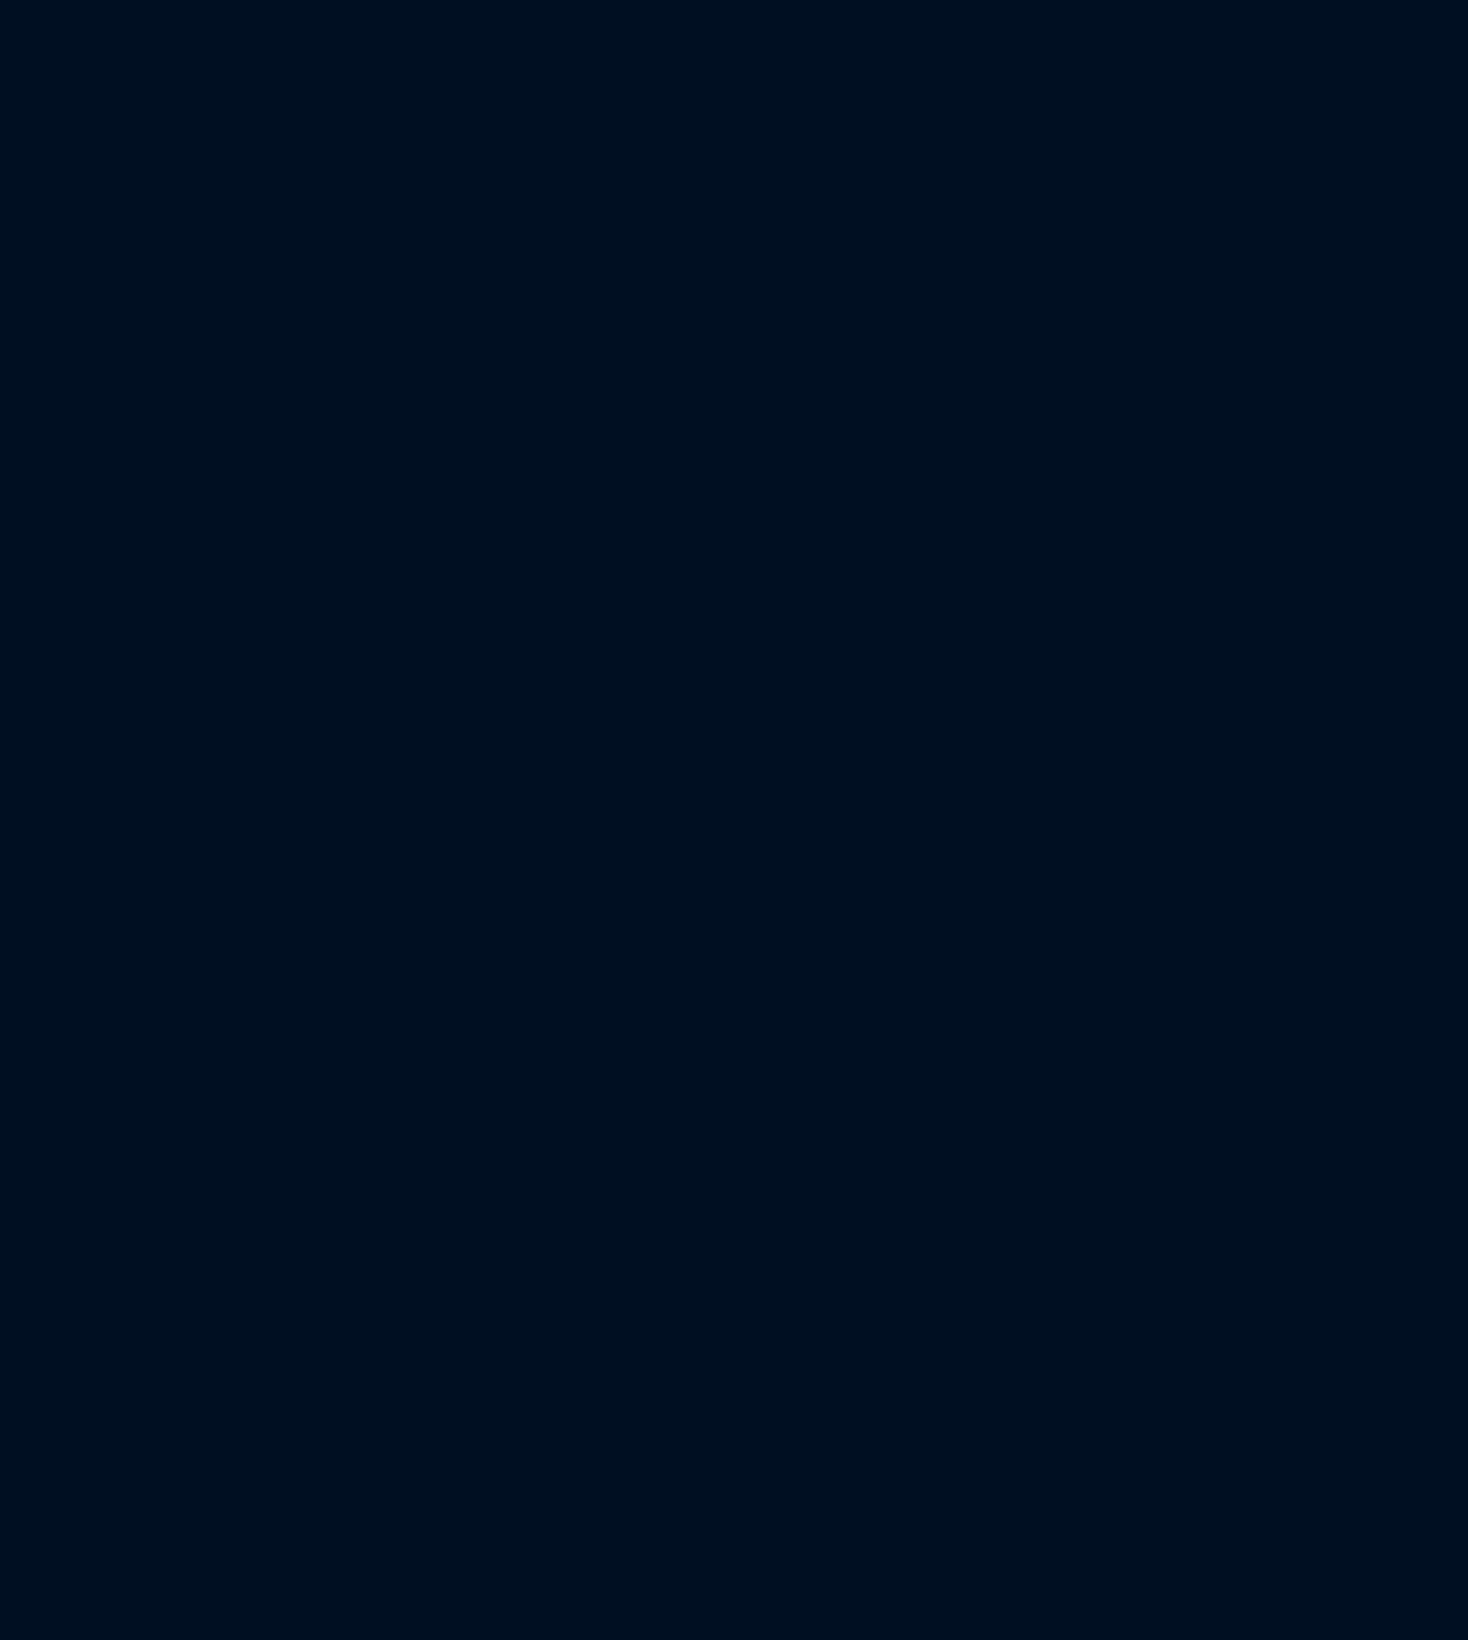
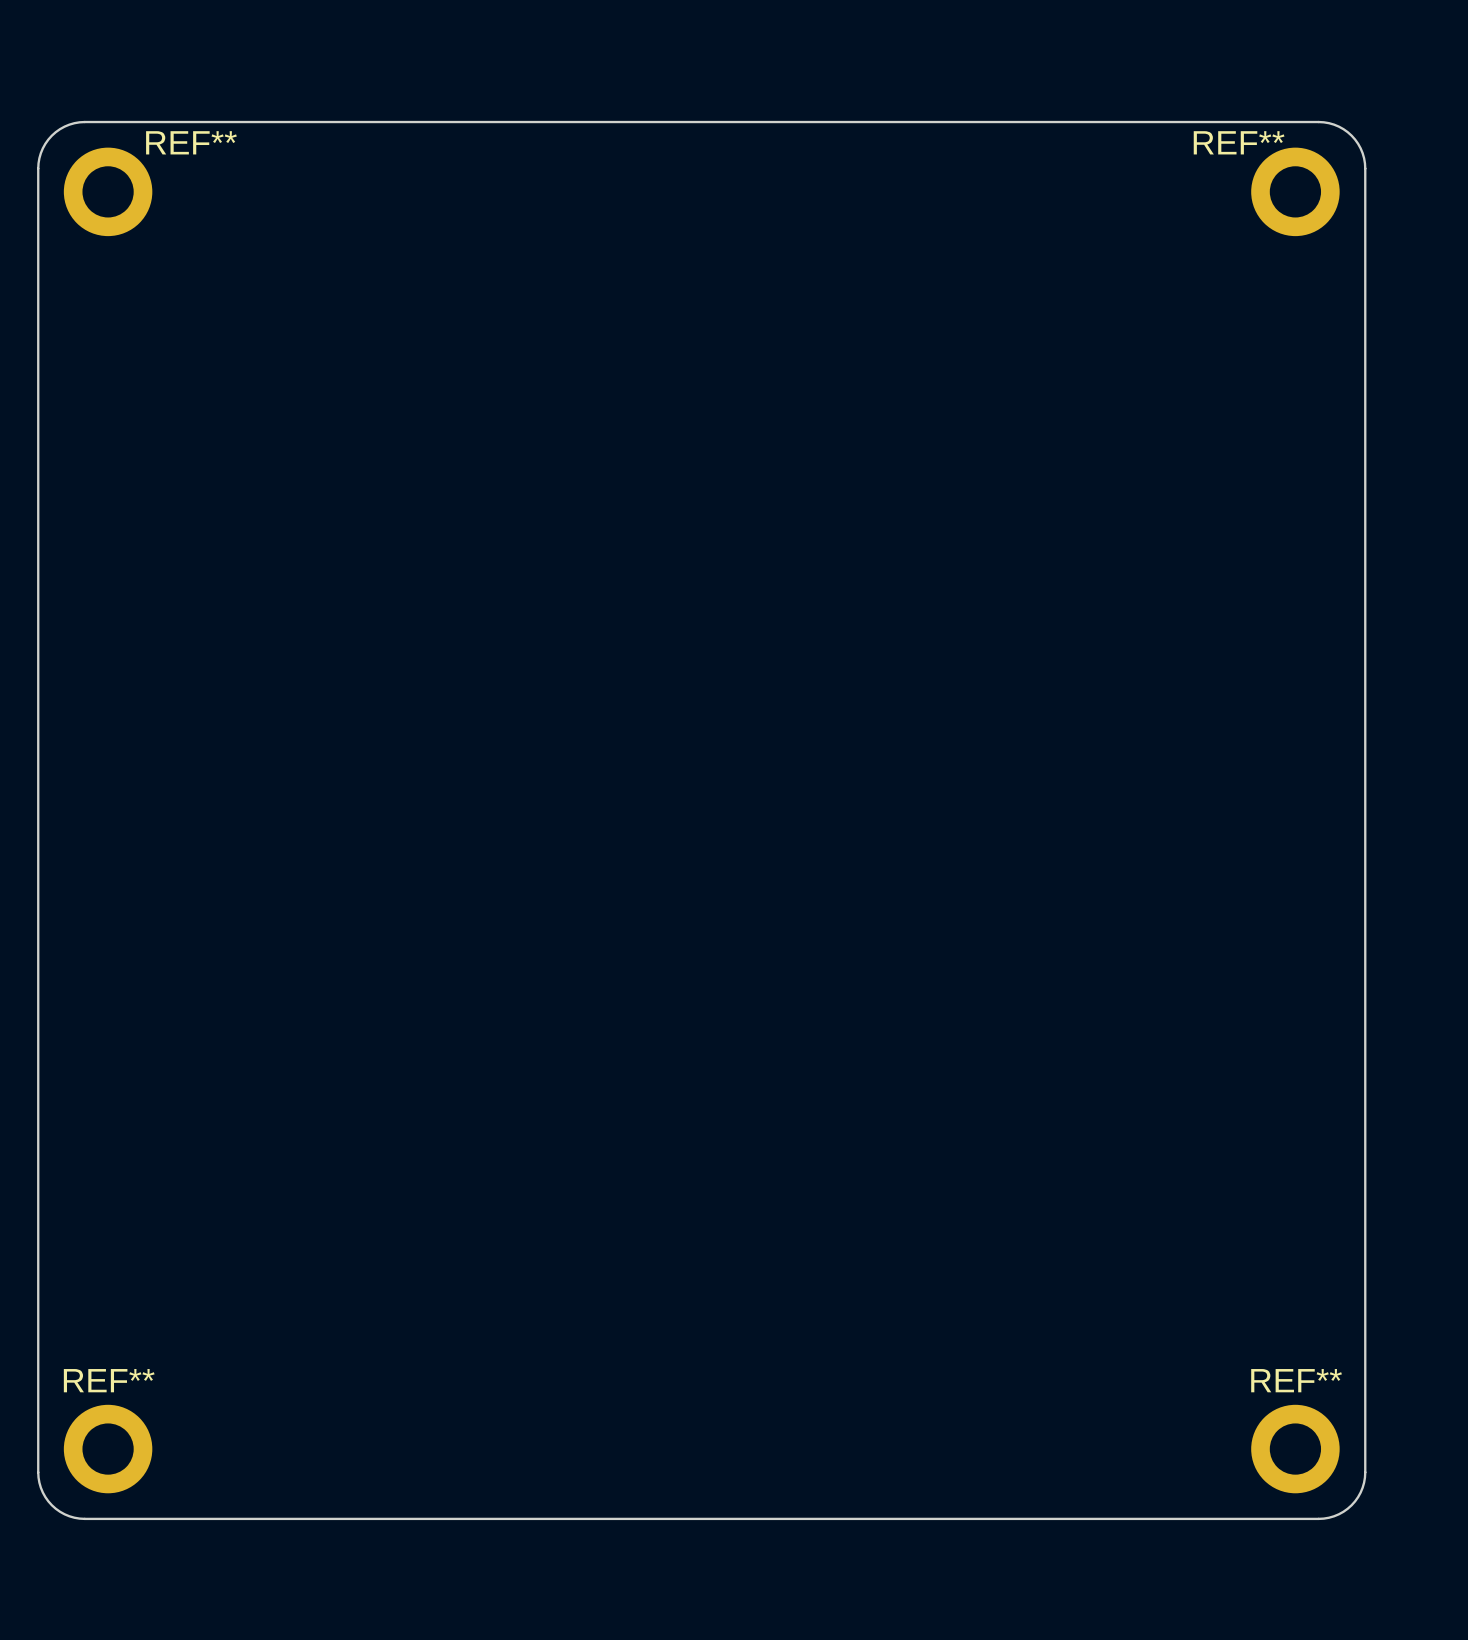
board edge: none -> (84, 122) (1318, 122) (1338, 126) (1351, 135) (1360, 148) (1365, 168) (1365, 1472) (1360, 1492) (1351, 1505) (1334, 1516) (1318, 1518) (84, 1518) (64, 1514) (51, 1505) (42, 1492) (38, 1472) (38, 168) (40, 153) (51, 135) (69, 124) (84, 122)
REF**: none -> (108, 191)
REF**: none -> (1295, 191)
REF**: none -> (108, 1449)
REF**: none -> (1295, 1449)

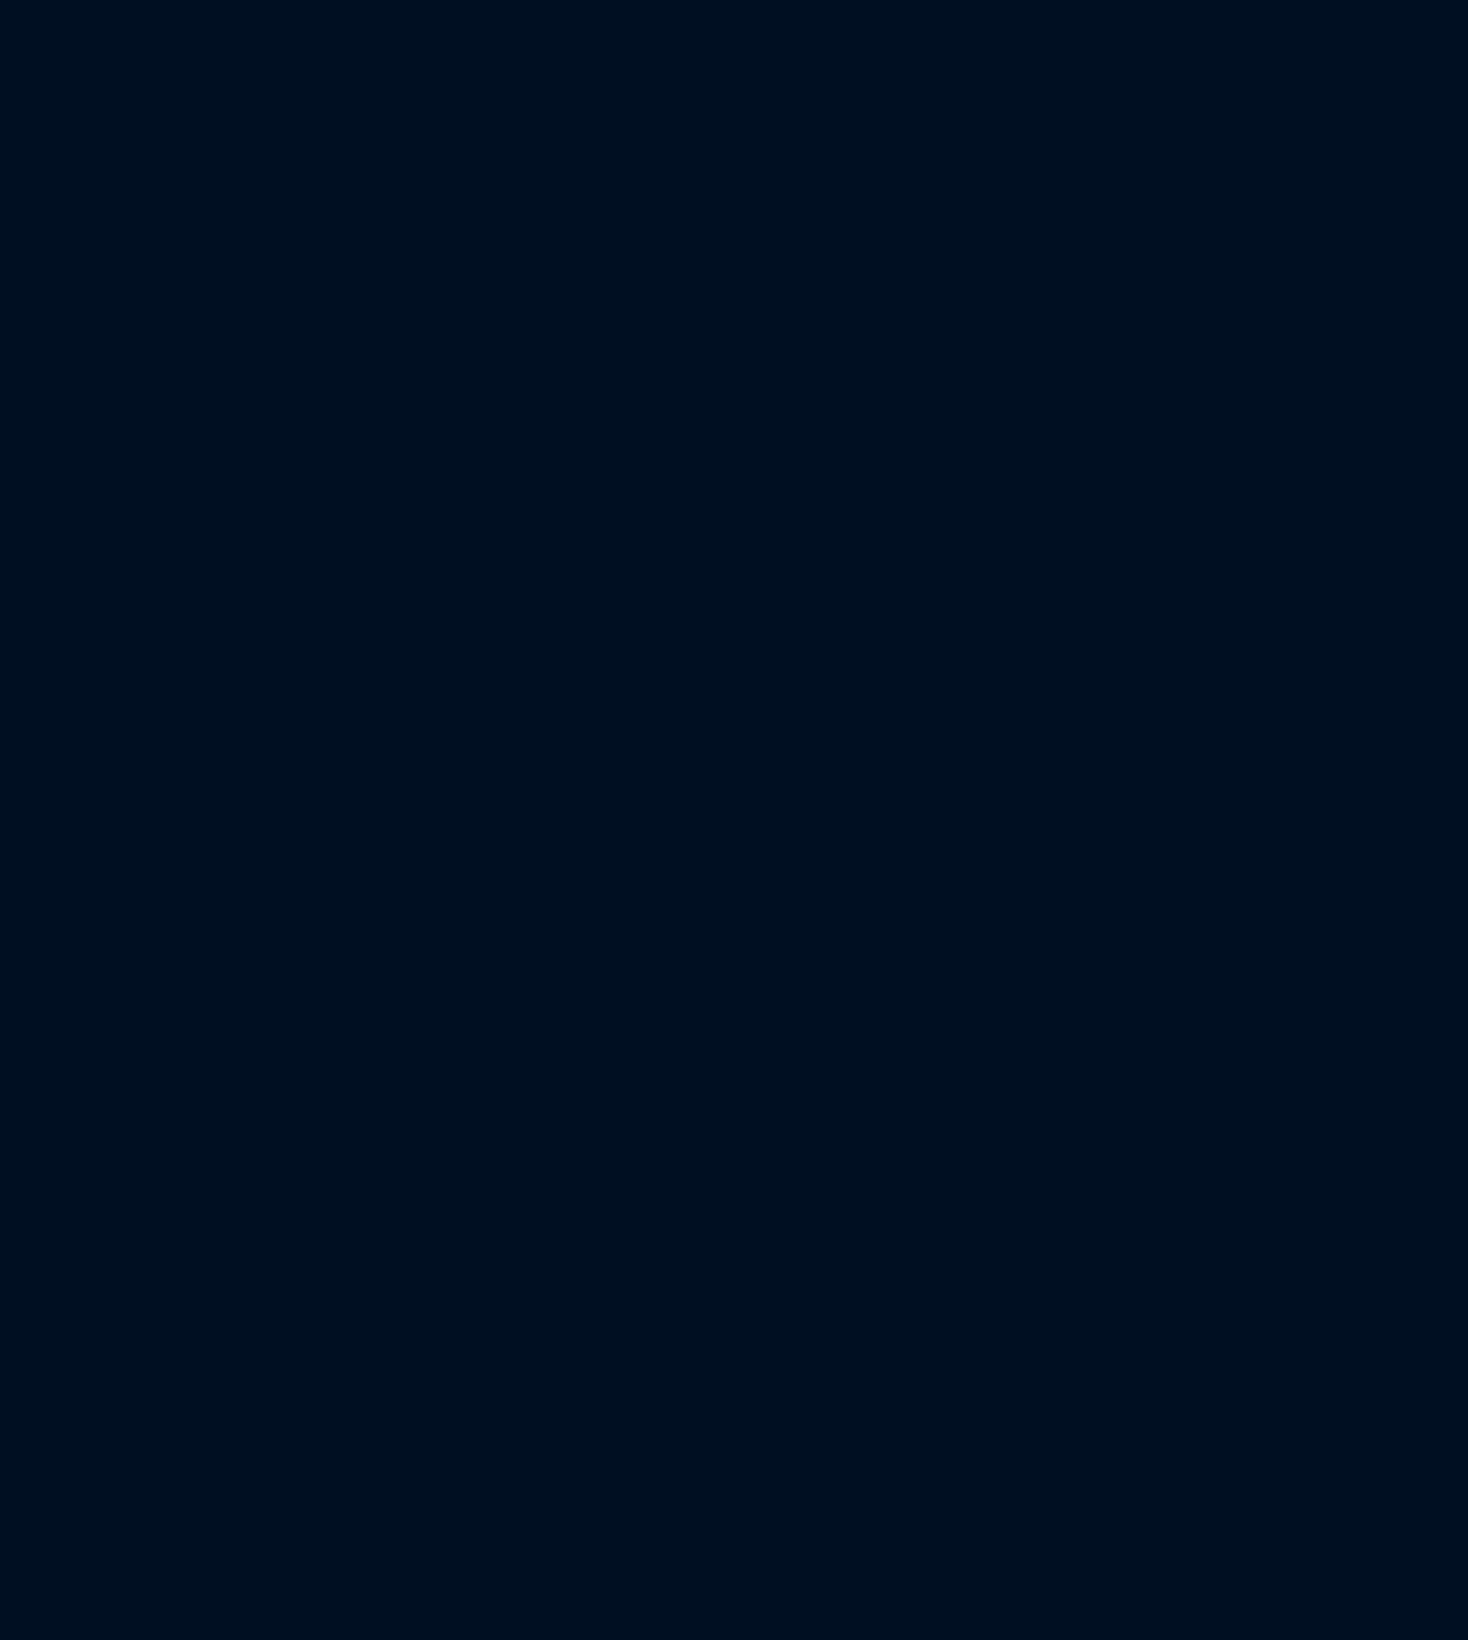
board edge: (84, 122) (1318, 122) (1338, 126) (1351, 135) (1360, 148) (1365, 168) (1365, 1472) (1360, 1492) (1351, 1505) (1334, 1516) (1318, 1518) (84, 1518) (64, 1514) (51, 1505) (42, 1492) (38, 1472) (38, 168) (40, 153) (51, 135) (69, 124) (84, 122) -> none
REF**: (108, 191) -> none
REF**: (1295, 191) -> none
REF**: (108, 1449) -> none
REF**: (1295, 1449) -> none

